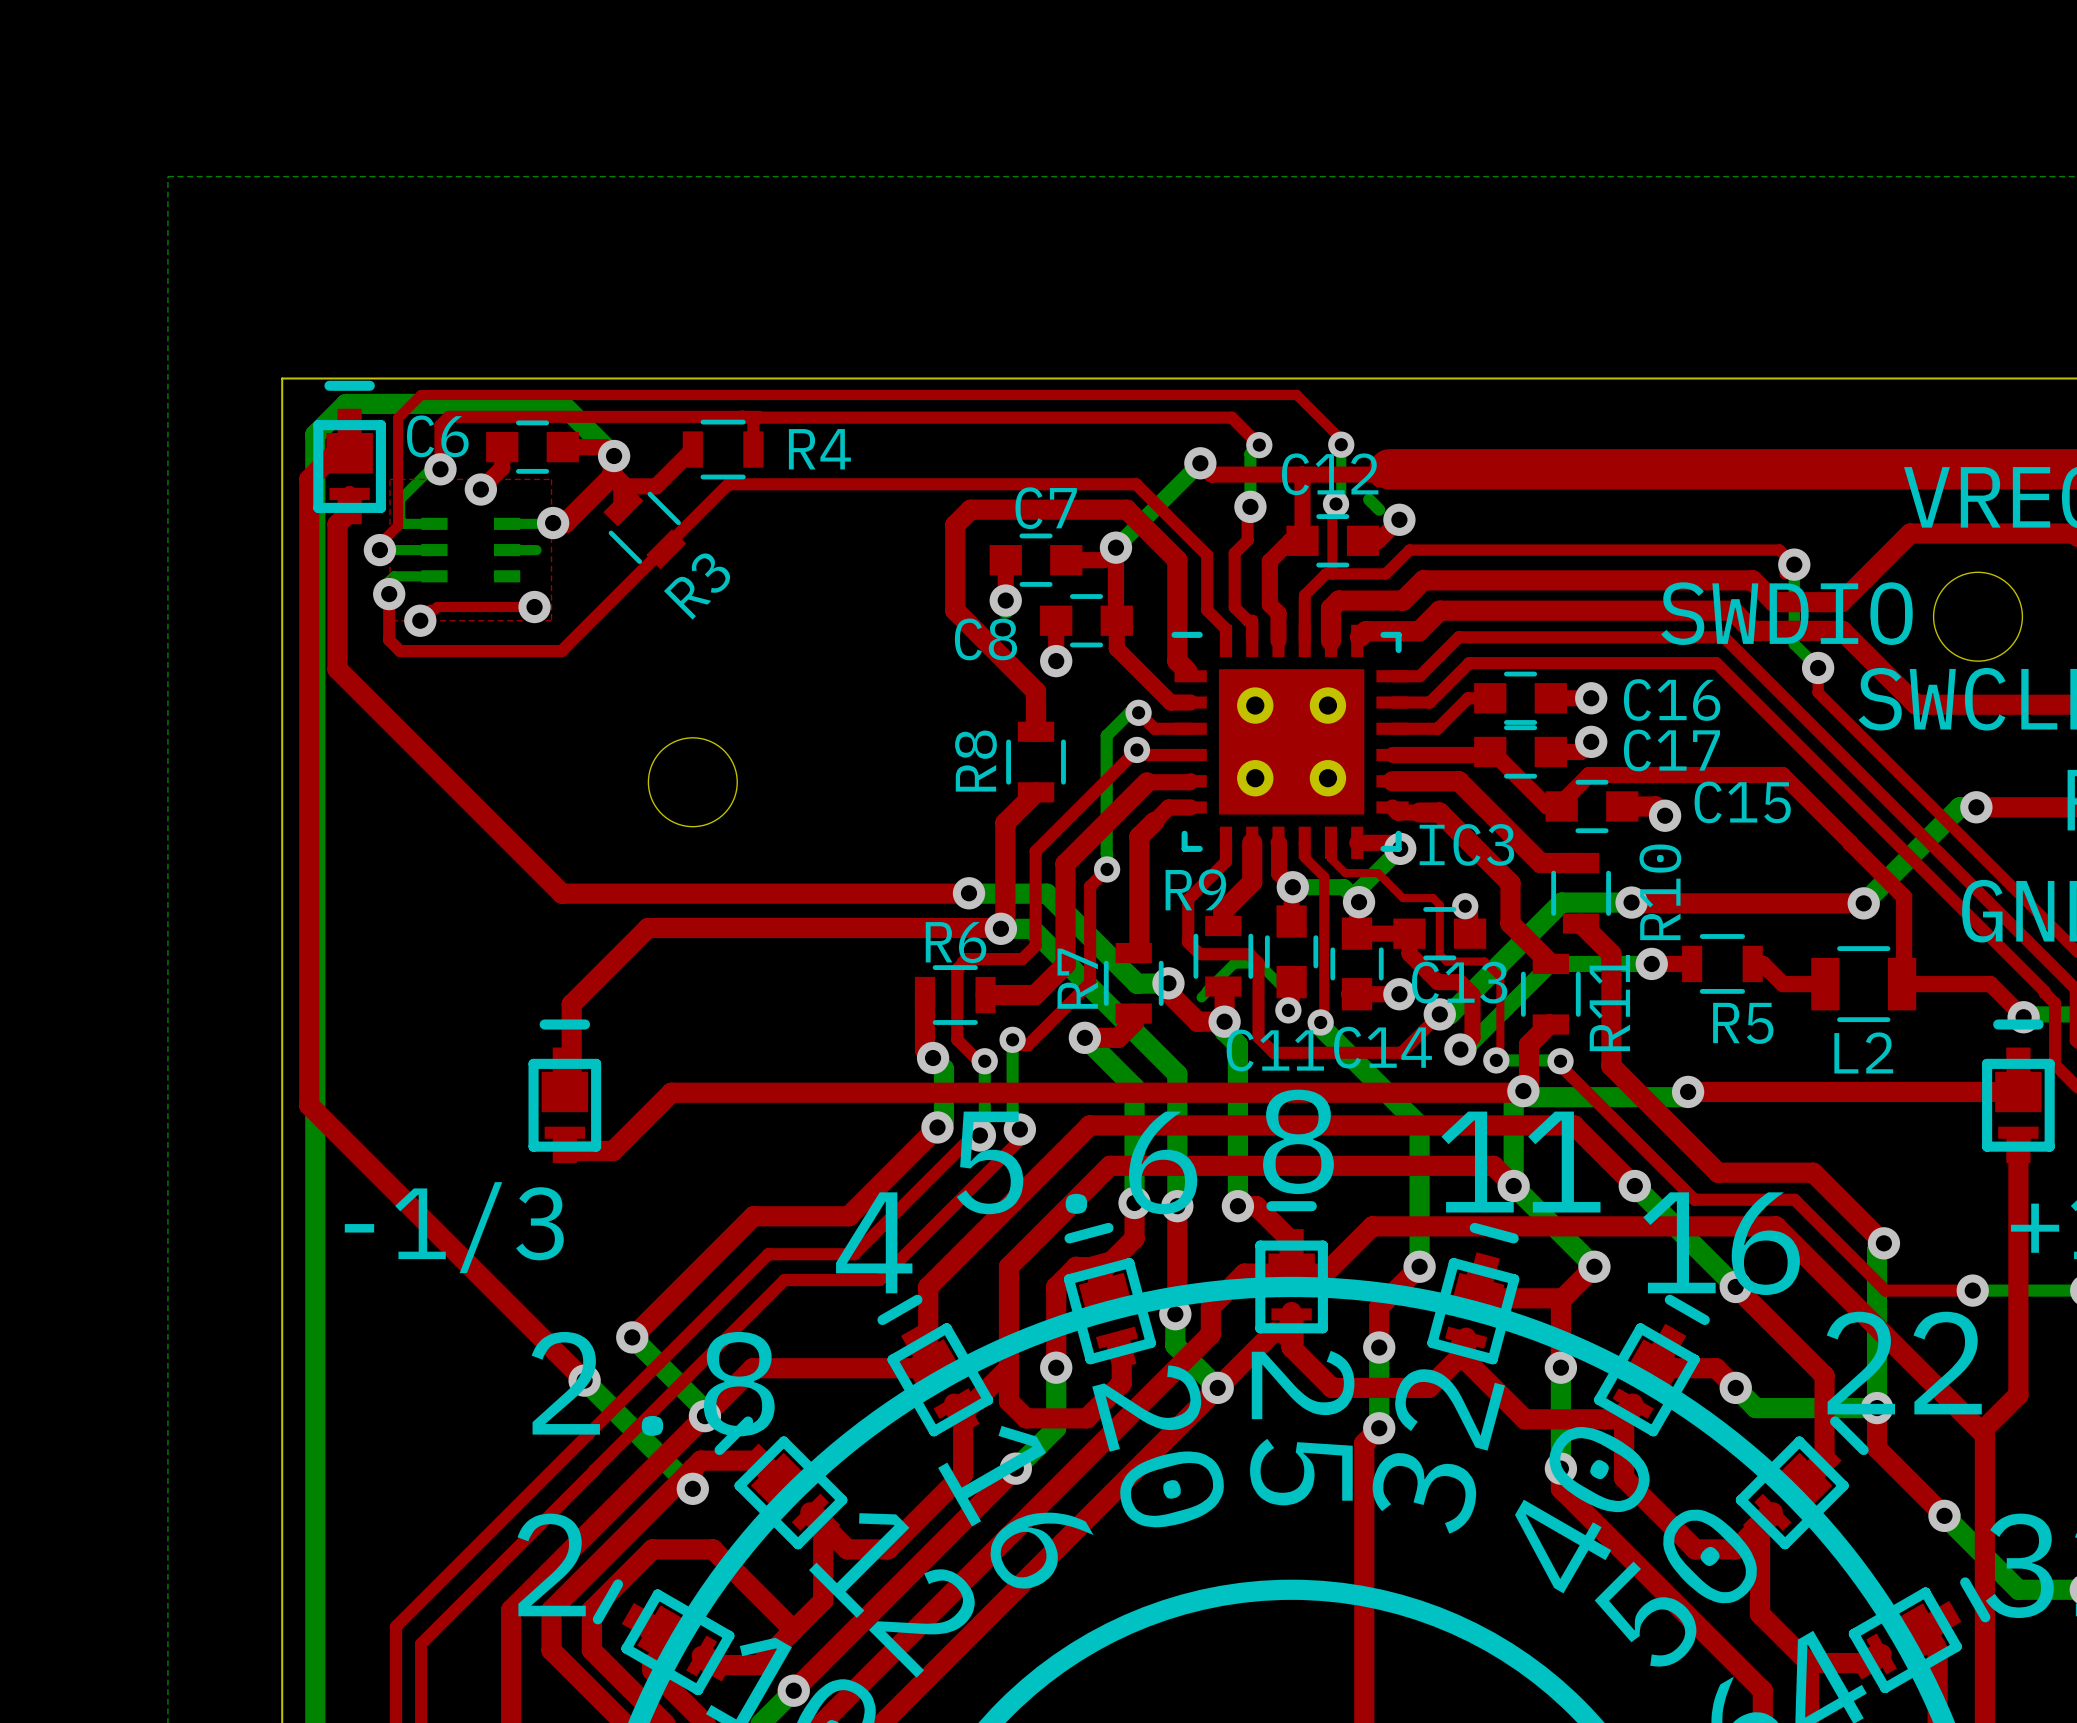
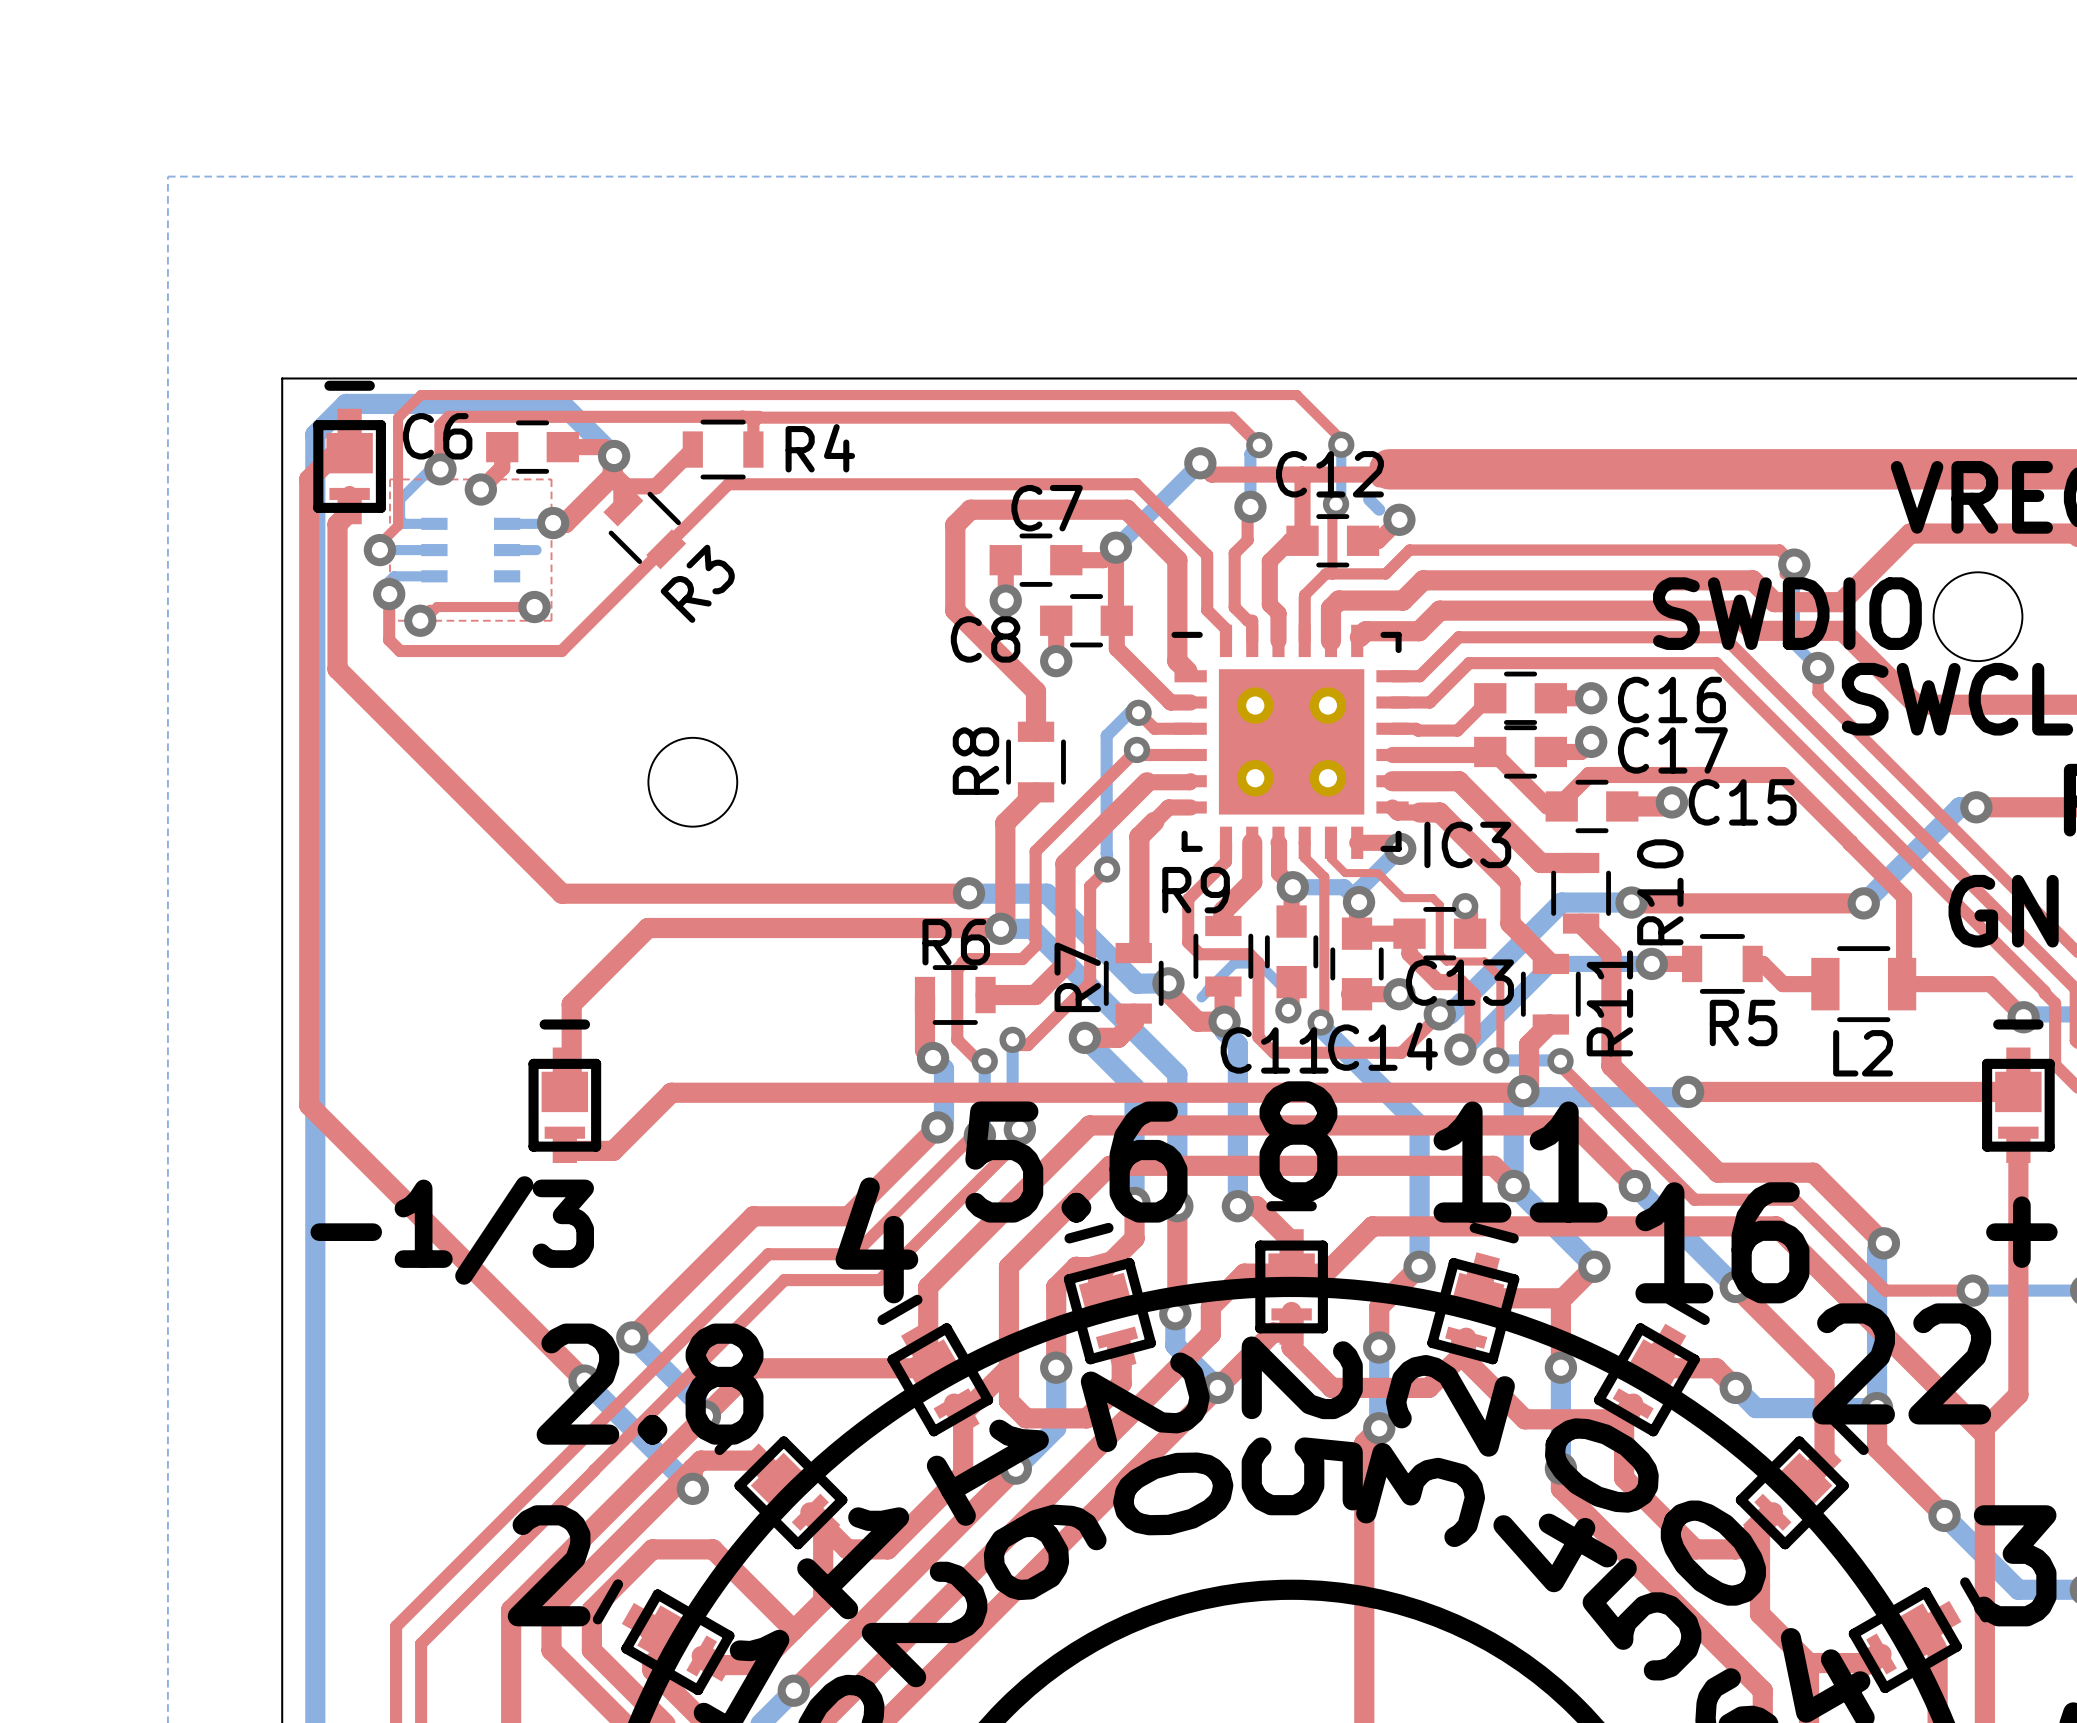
top track: (1489, 698) (1468, 698) (1437, 728) (1416, 728) -> (1489, 698) (1457, 730) (1417, 730) (1416, 728)
via position: (1665, 815) -> (1671, 802)

